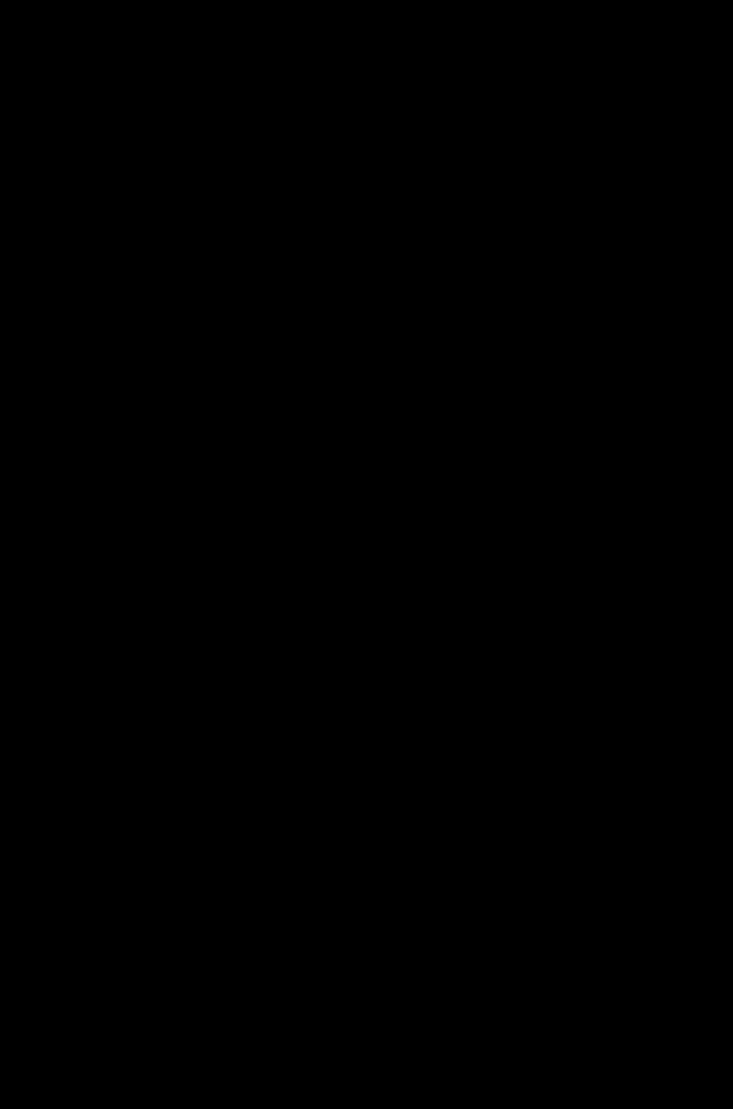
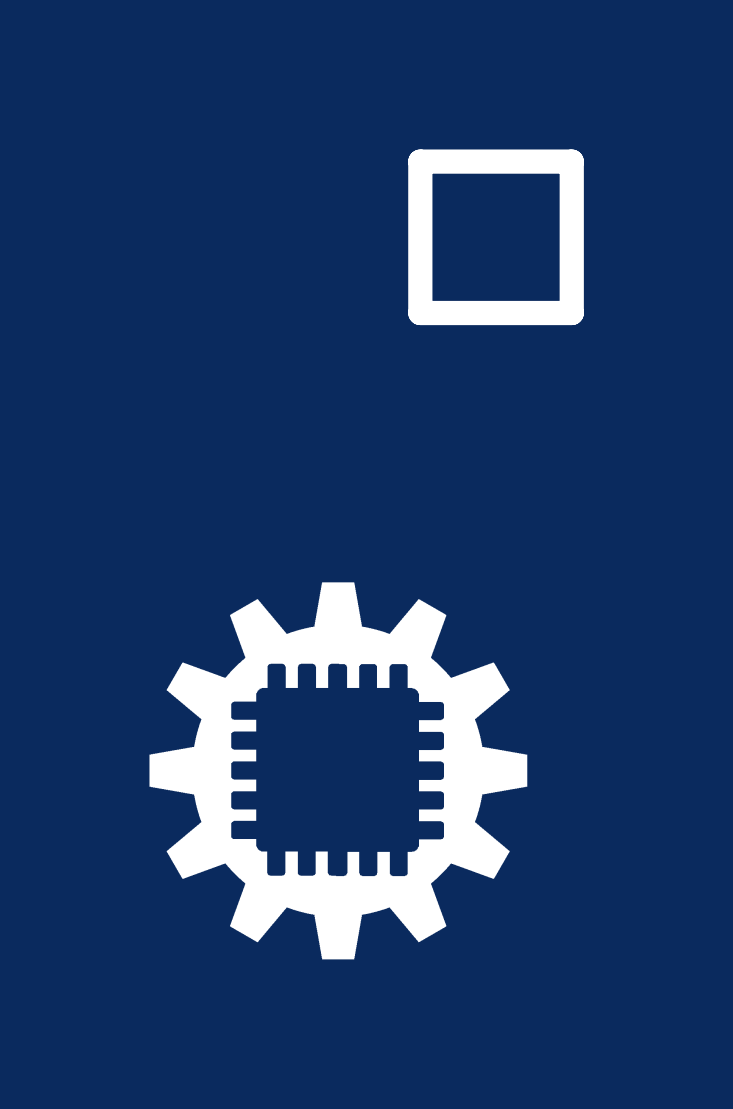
line: none -> (420, 161) (571, 161) (571, 313) (420, 313) (420, 161)
drawing: none -> [149, 582, 528, 960]

